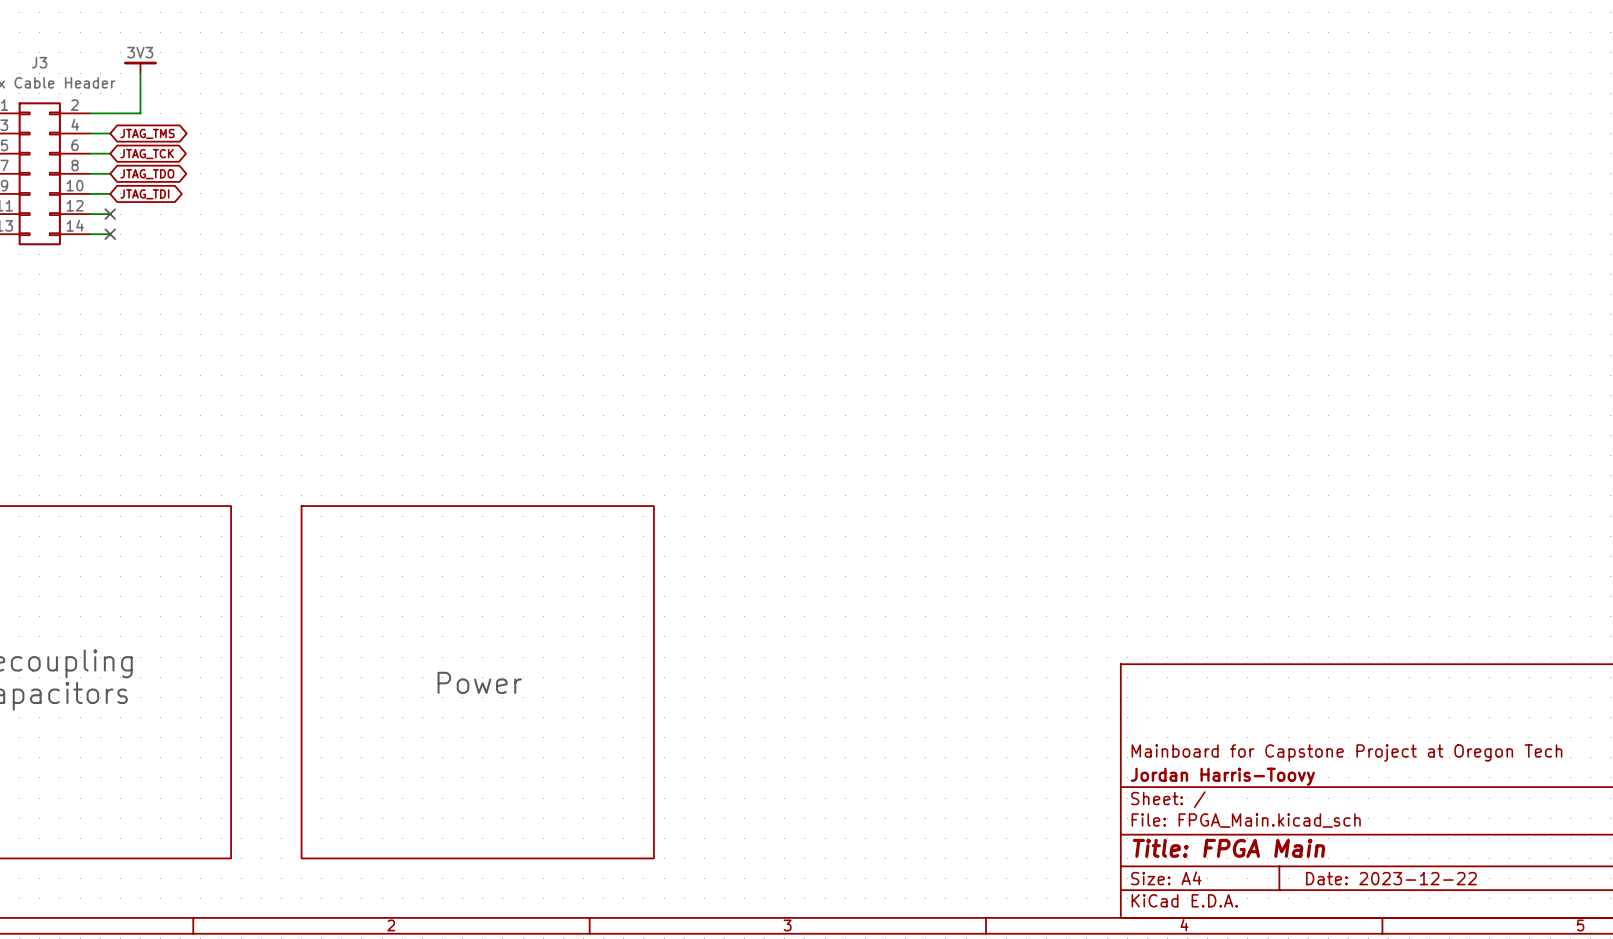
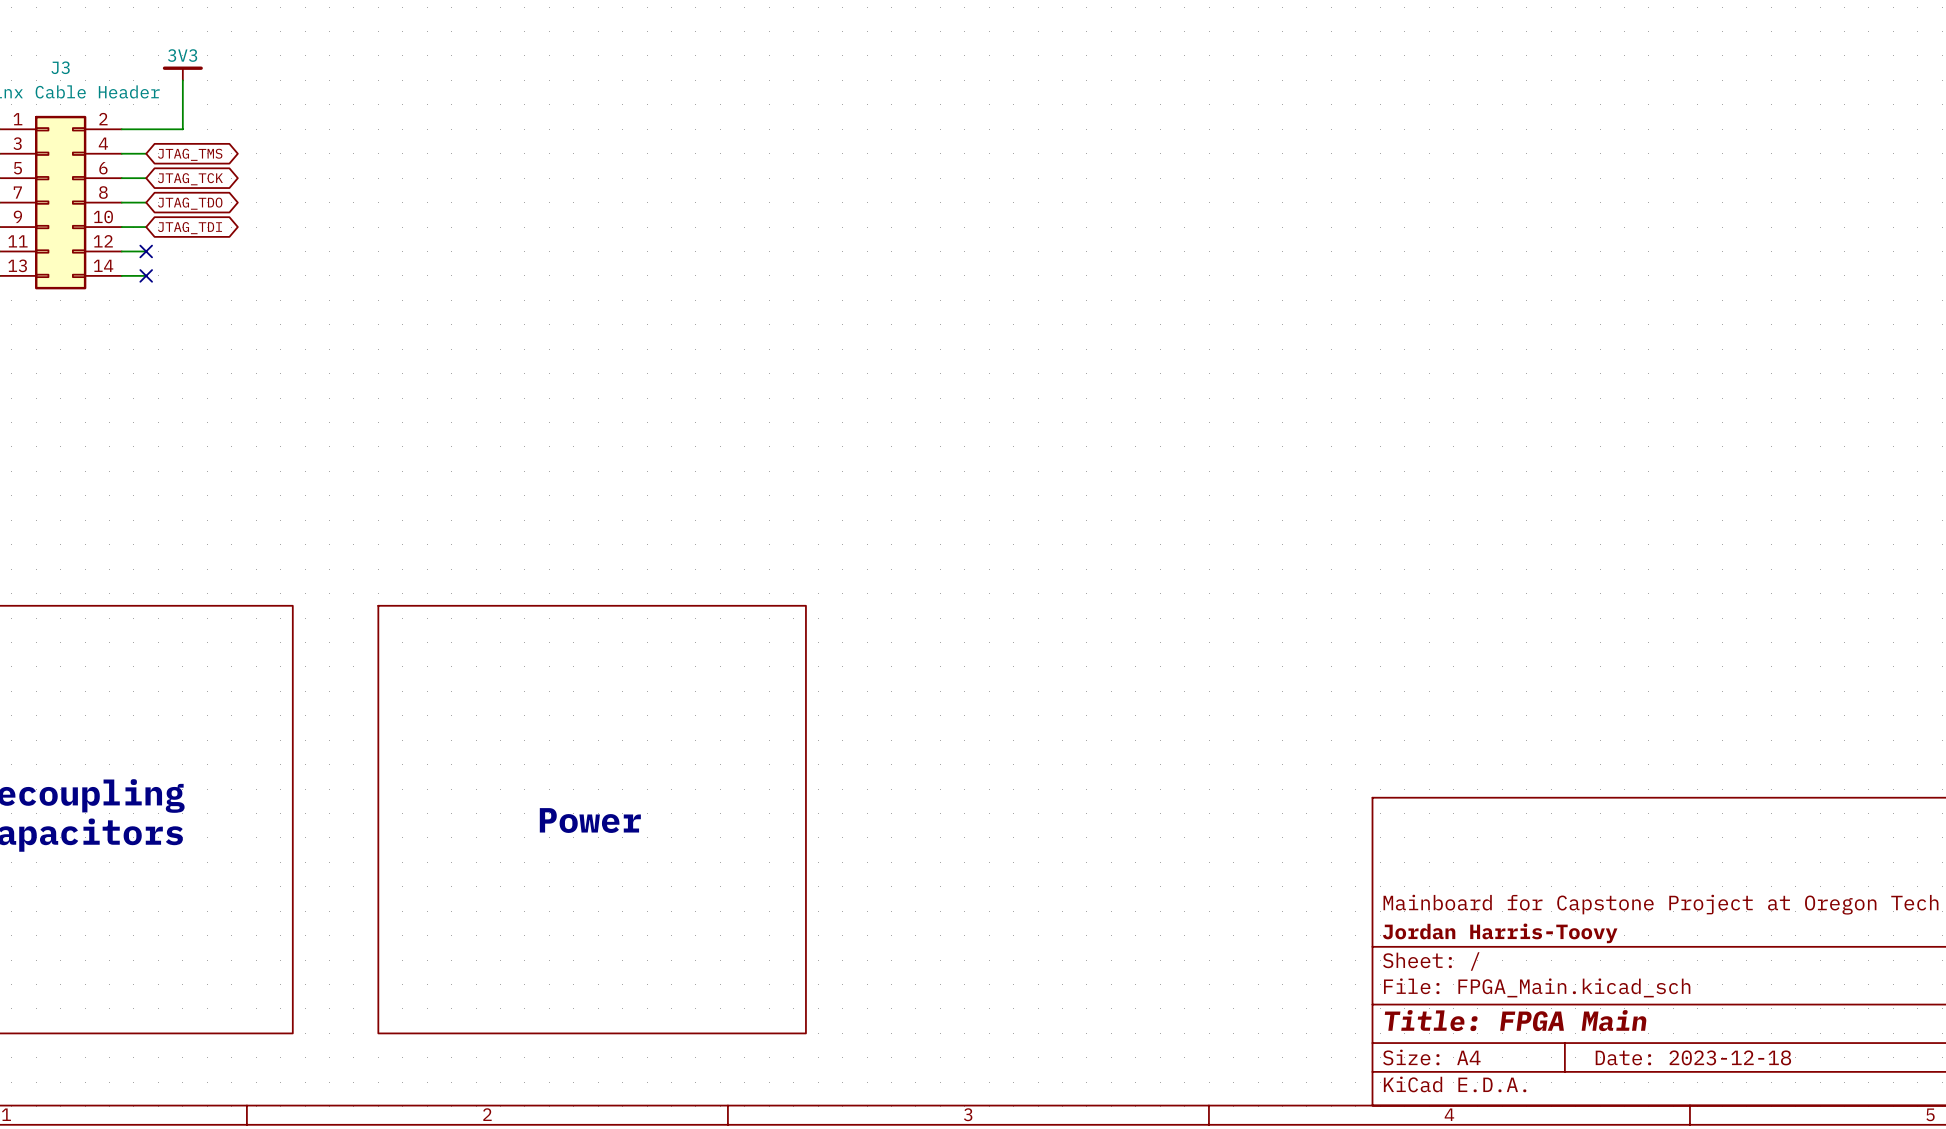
title block: Date: 2023-12-22 (1391, 878) -> Date: 2023-12-18 (1693, 1057)

